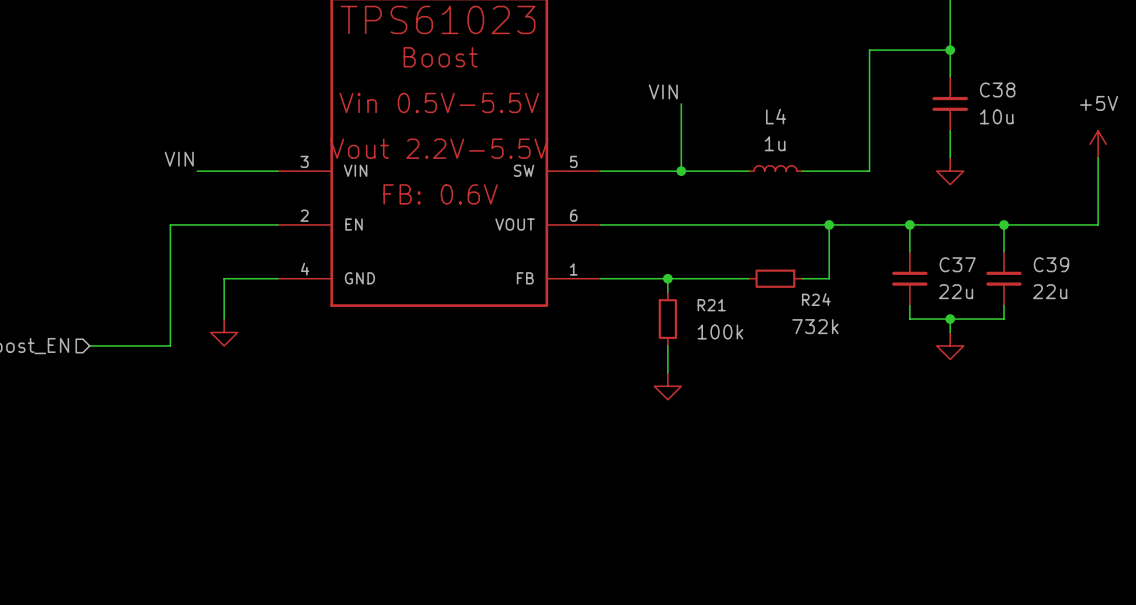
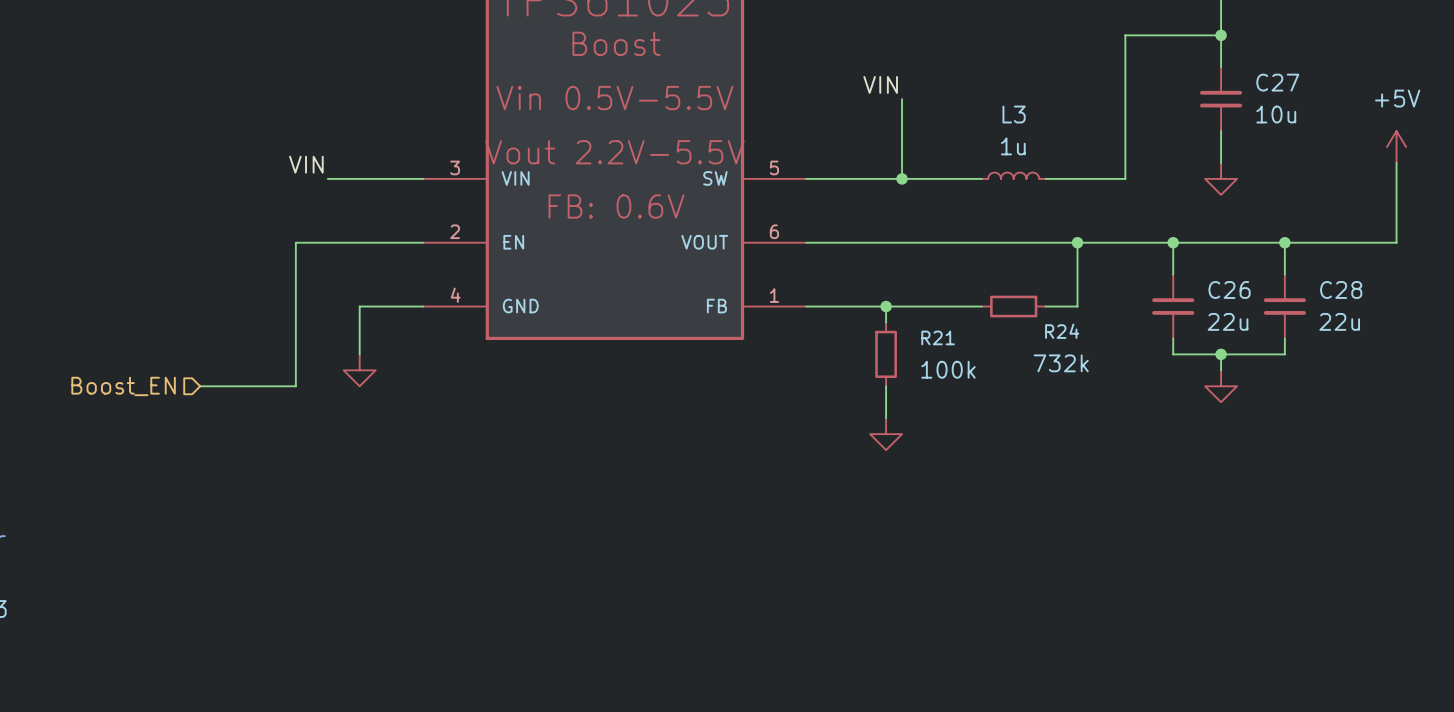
C38 name: C38 (997, 89) -> C27 (1277, 82)
L4 name: L4 (776, 116) -> L3 (1014, 114)
C37 name: C37 (957, 264) -> C26 (1229, 289)
C39 name: C39 (1051, 264) -> C28 (1341, 289)

